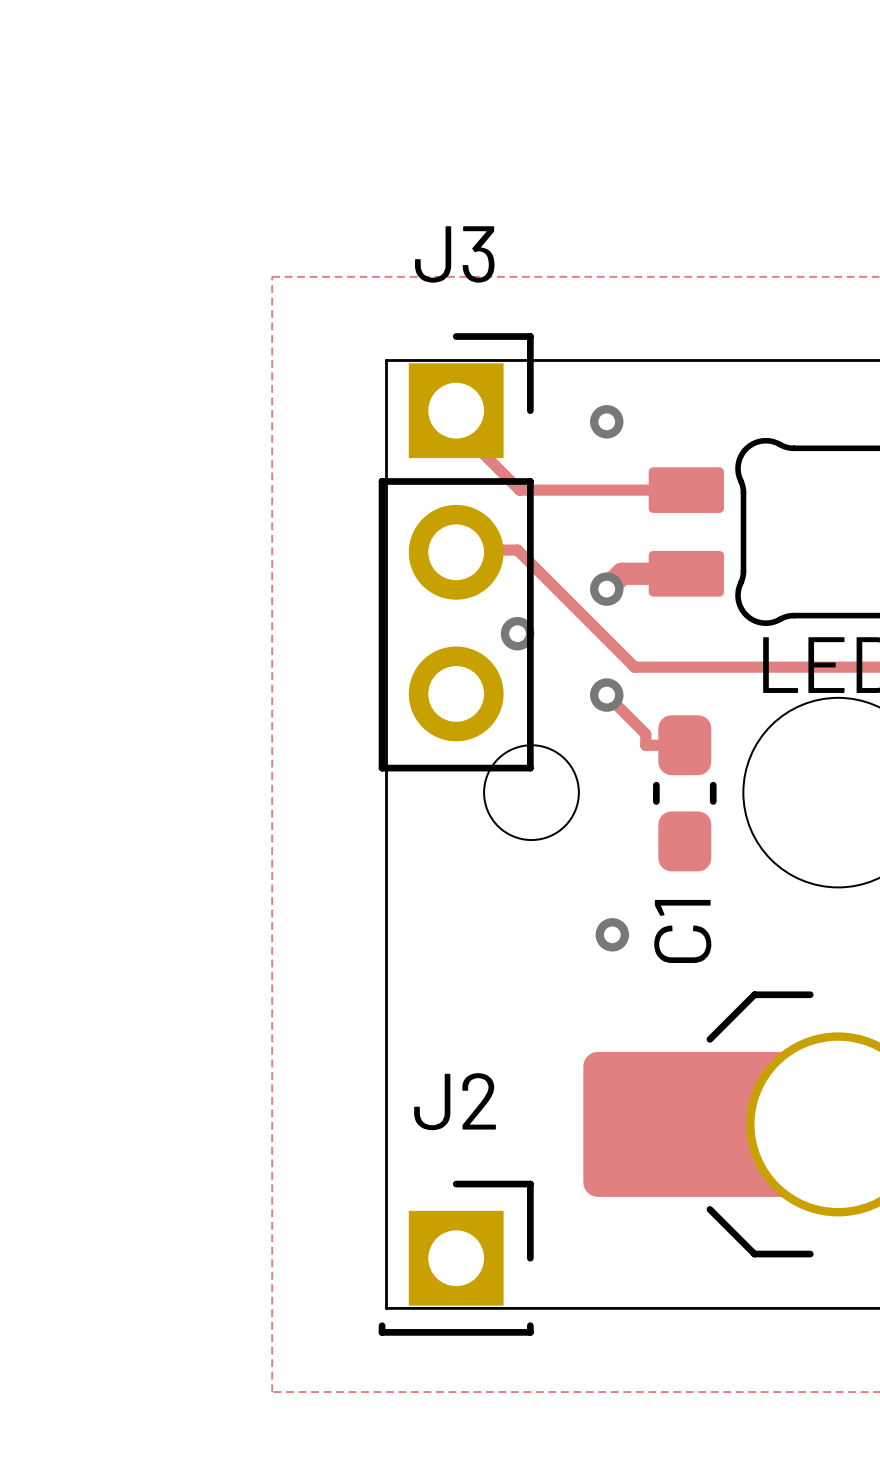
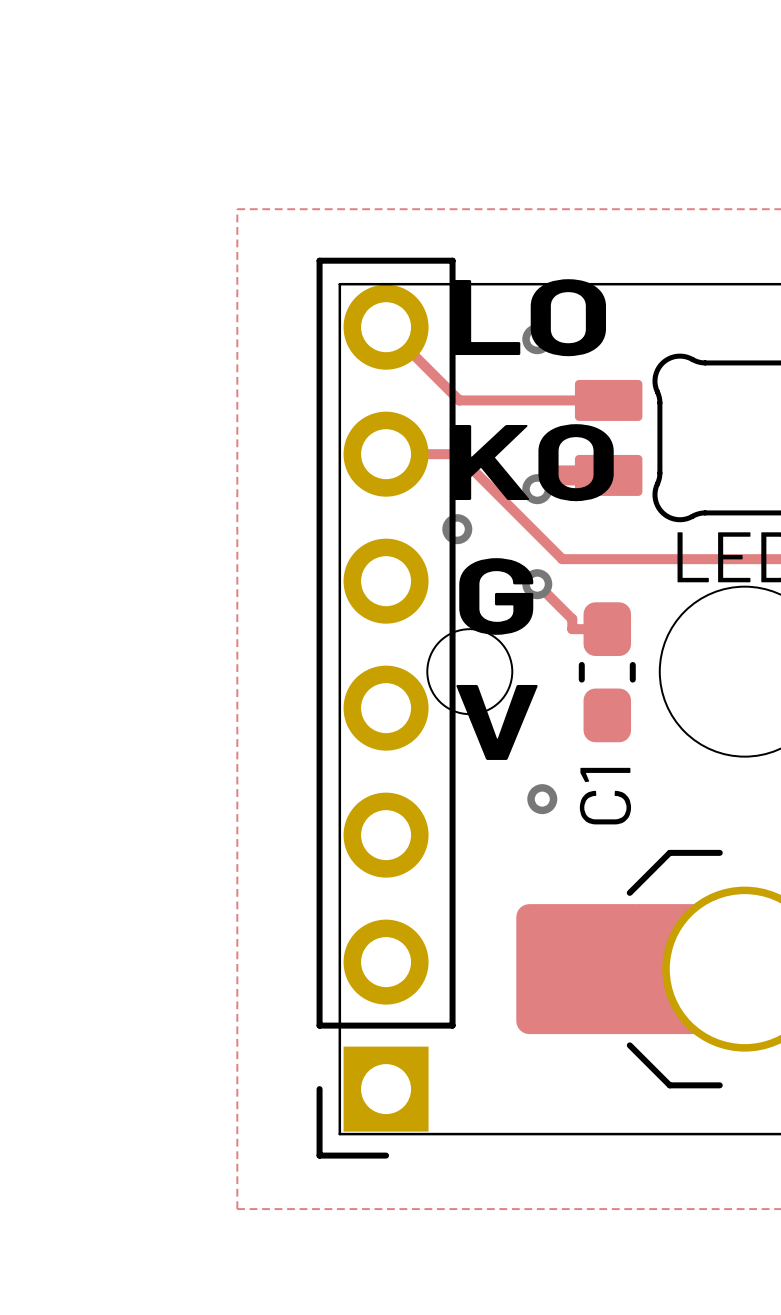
text: none -> LO (528, 317)
J3: (456, 552) -> none
text: none -> KO (532, 462)
text: none -> G (496, 596)
part: none -> (386, 708)
text: none -> V (497, 722)
J2: (456, 1258) -> none

